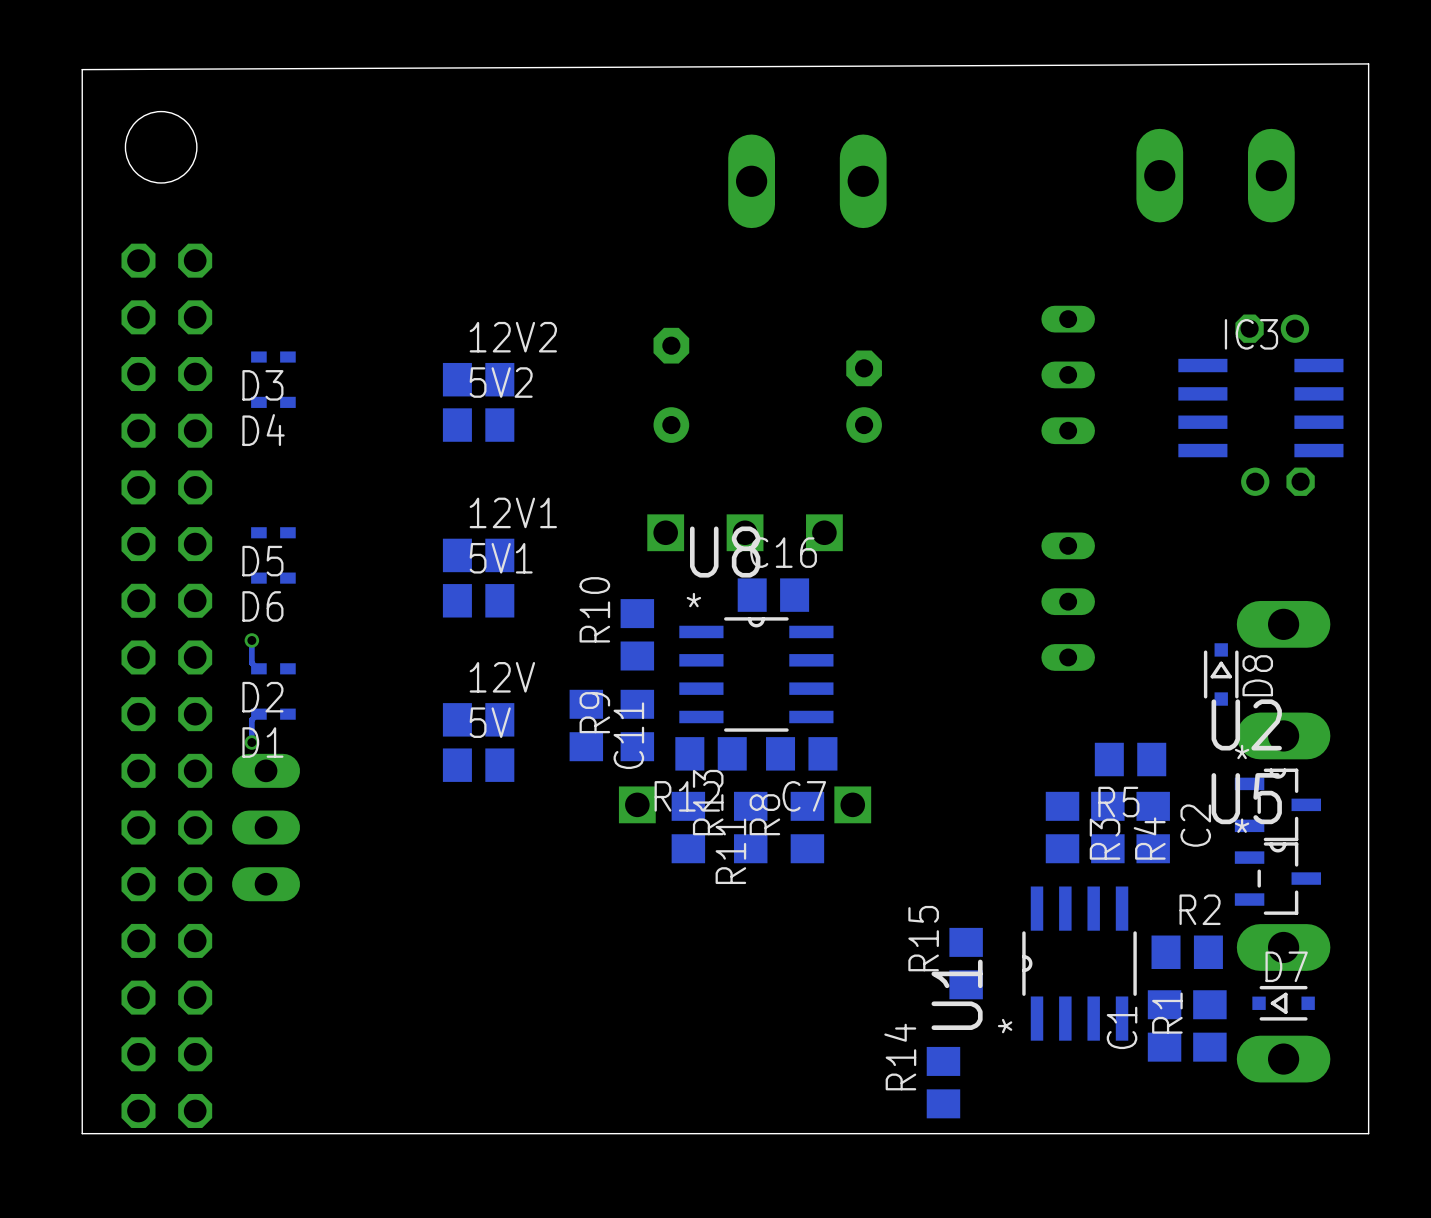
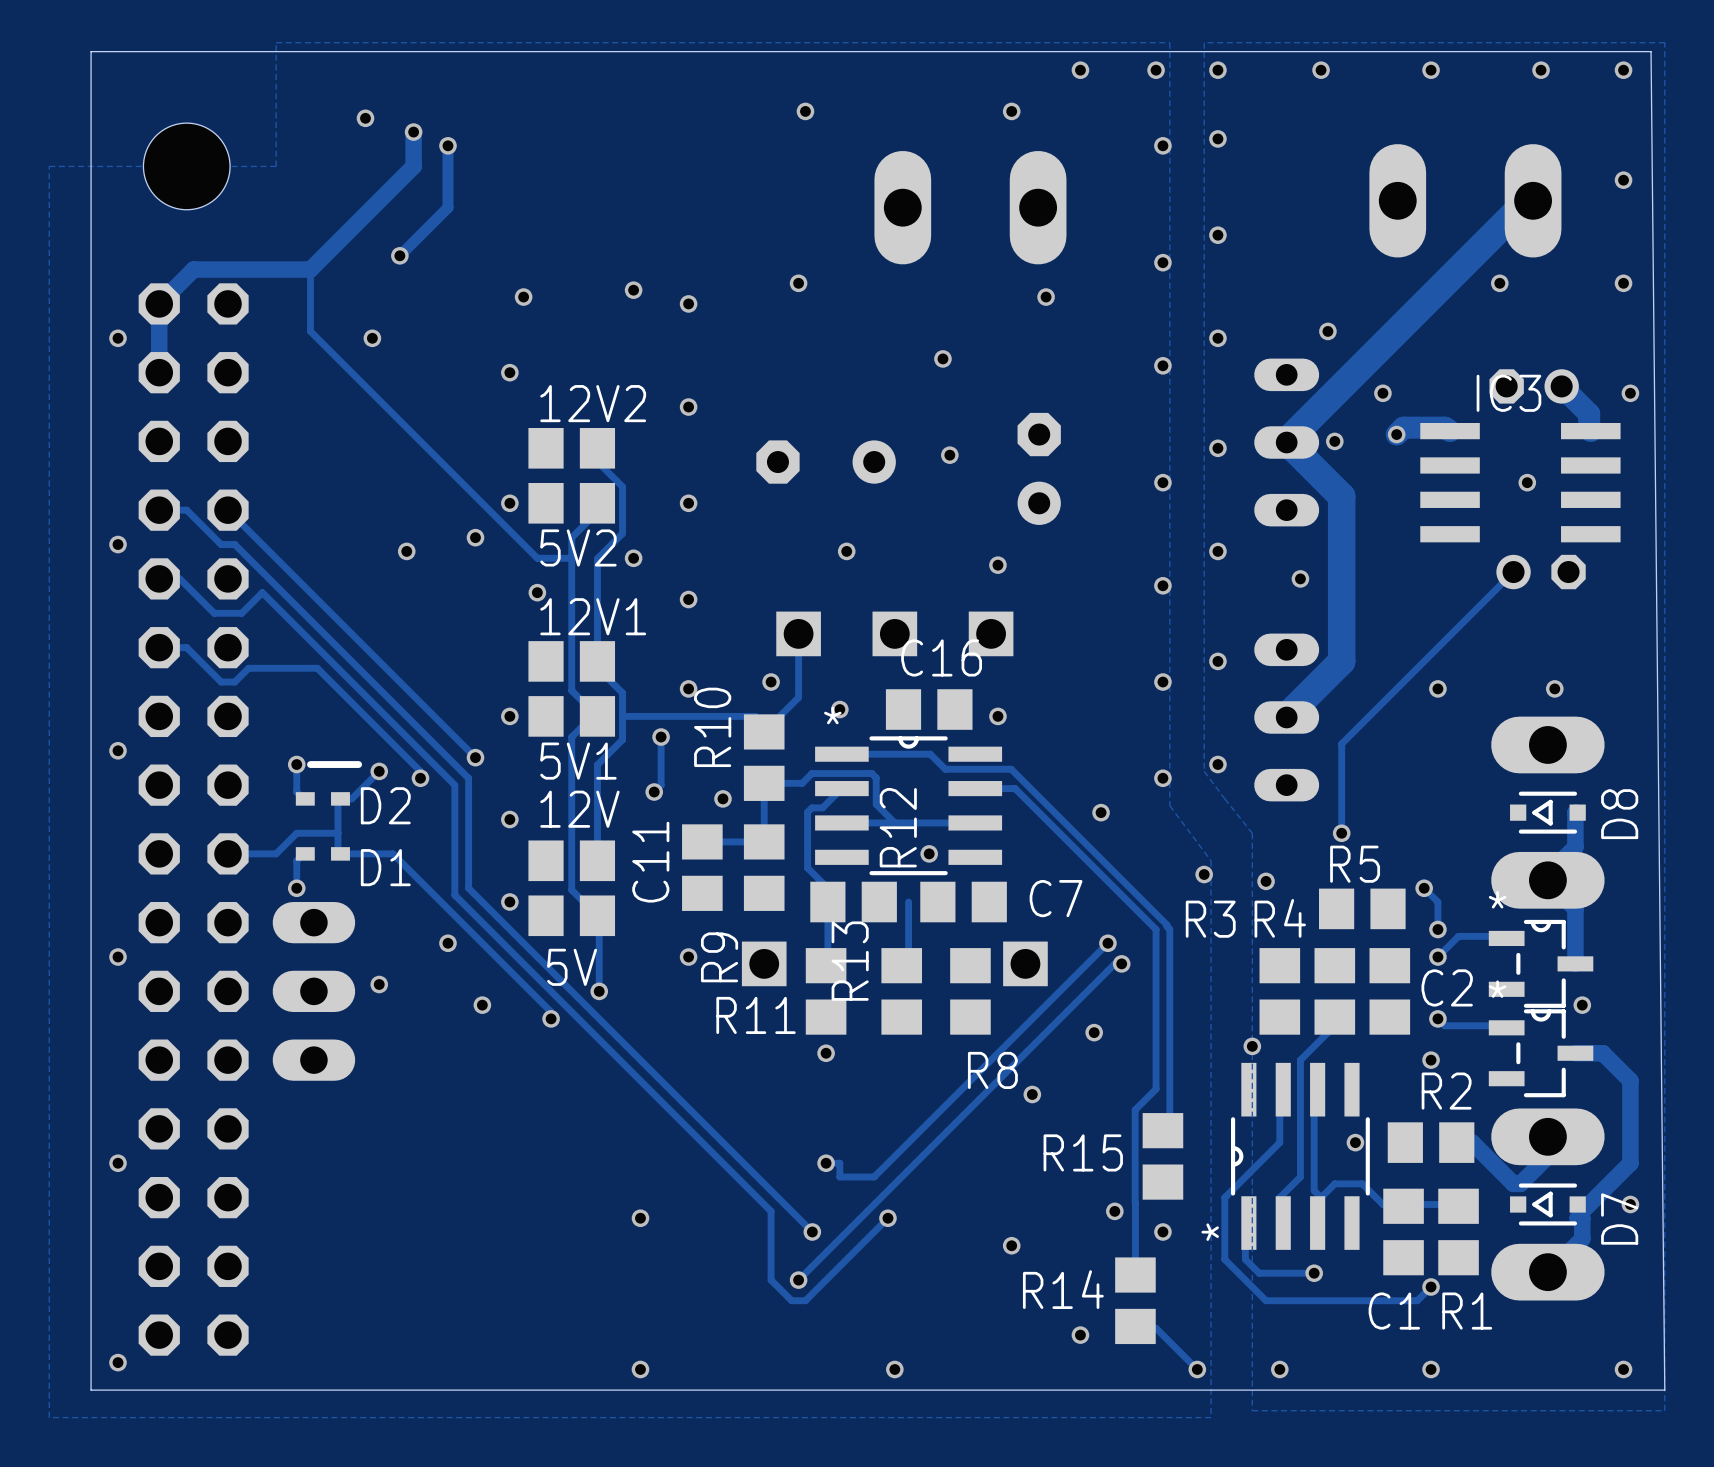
zone outline: none -> (1169, 42) (1169, 805) (1211, 860) (1211, 1417) (49, 1417) (49, 166) (276, 166) (276, 42) (1169, 42)
zone outline: none -> (1664, 42) (1204, 42) (1204, 771) (1252, 833) (1252, 1410) (1664, 1410) (1664, 42)
via: none -> (1080, 70)
via: none -> (1156, 70)
via: none -> (1217, 70)
via: none -> (1321, 70)
via: none -> (1431, 70)
via: none -> (1541, 70)
via: none -> (1623, 70)
board edge: (82, 69) (1368, 63) (1368, 1133) (82, 1133) -> (91, 72) (91, 51) (1651, 51) (1664, 1390) (91, 1390) (91, 1362)
via: none -> (805, 111)
via: none -> (1011, 111)
via: none -> (365, 118)
track: none -> (413, 132) (413, 166) (310, 269)
via: none -> (413, 132)
via: none -> (1217, 138)
track: none -> (447, 145) (447, 207) (399, 255)
via: none -> (447, 145)
via: none -> (1162, 145)
via: none -> (1623, 180)
track: none -> (1533, 200) (1527, 200) (1286, 441) (1341, 496) (1341, 661) (1286, 717)
via: none -> (1217, 235)
via: none -> (399, 255)
via: none -> (1162, 262)
track: none -> (310, 269) (193, 269) (159, 303) (159, 372)
track: none -> (310, 269) (310, 331) (537, 558) (571, 558)
via: none -> (798, 283)
via: none -> (1499, 283)
via: none -> (1623, 283)
via: none -> (633, 290)
via: none -> (523, 297)
via: none -> (1046, 297)
via: none -> (688, 303)
via: none -> (1327, 331)
via: none -> (118, 338)
via: none -> (372, 338)
via: none -> (1217, 338)
via: none -> (942, 358)
via: none -> (1162, 365)
via: none -> (509, 372)
track: none -> (1561, 386) (1589, 413) (1590, 431)
via: none -> (1382, 393)
via: none -> (1630, 393)
12V2 name position: 12V2 (513, 337) -> 12V2 (593, 403)
via: none -> (688, 407)
D3: (273, 357) -> none
track: none -> (1450, 431) (1444, 427) (1403, 427) (1396, 434)
via: none -> (1396, 434)
via: none -> (1334, 441)
track: none -> (597, 448) (597, 461) (622, 486) (622, 533) (597, 558) (597, 667) (622, 692) (622, 739) (597, 764) (597, 860)
via: none -> (1217, 448)
5V2 name position: 5V2 (501, 382) -> 5V2 (578, 547)
part rotation: 0° (671, 385) -> 90° counterclockwise (826, 462)
via: none -> (949, 455)
D4: (273, 402) -> none
via: none -> (1162, 482)
via: none -> (1527, 482)
via: none -> (509, 503)
via: none -> (688, 503)
track: none -> (159, 510) (186, 510) (221, 544) (234, 544) (468, 778) (468, 888) (812, 1231)
track: none -> (228, 510) (475, 757)
track: none -> (597, 510) (571, 537) (571, 690) (597, 716) (592, 716) (571, 737) (571, 890) (599, 915) (599, 991)
via: none -> (475, 537)
via: none -> (118, 544)
via: none -> (406, 551)
via: none -> (846, 551)
via: none -> (1217, 551)
via: none -> (633, 558)
via: none -> (997, 565)
track: none -> (1513, 572) (1341, 743) (1341, 833)
track: none -> (159, 578) (179, 578) (214, 613) (241, 613) (262, 592) (454, 785) (454, 895) (771, 1211) (771, 1280) (791, 1300) (805, 1300) (887, 1218)
via: none -> (1300, 578)
via: none -> (1162, 585)
via: none -> (537, 592)
via: none -> (688, 599)
12V1 name position: 12V1 (513, 512) -> 12V1 (593, 616)
D5: (273, 532) -> none
track: none -> (798, 633) (798, 697) (764, 731) (755, 716) (622, 716)
track: none -> (159, 647) (186, 647) (221, 682) (234, 682) (248, 668) (317, 668) (420, 771) (420, 778)
U8 name: U8 (725, 552) -> none
via: none -> (1217, 661)
5V1 name position: 5V1 (501, 558) -> 5V1 (578, 761)
via: none -> (771, 682)
via: none -> (1162, 682)
D6: (273, 578) -> none
via: none -> (688, 688)
via: none -> (1437, 688)
via: none -> (1554, 688)
via: none -> (839, 709)
via: none -> (509, 716)
via: none -> (997, 716)
track: none -> (661, 737) (661, 785) (654, 792)
via: none -> (661, 737)
via: none -> (118, 750)
track: none -> (841, 754) (930, 754) (945, 769) (1011, 769) (1167, 924) (1169, 929) (1169, 1123) (1162, 1130)
via: none -> (475, 757)
line: none -> (358, 764) (310, 764)
via: none -> (1217, 764)
track: none -> (379, 771) (351, 798) (338, 798) (338, 853) (392, 853) (551, 1012) (551, 1018)
via: none -> (379, 771)
via: none -> (420, 778)
via: none -> (1162, 778)
track: none -> (841, 788) (822, 807) (811, 807) (807, 812) (807, 868) (827, 888) (827, 963) (826, 965)
track: none -> (975, 788) (1015, 788) (1156, 929) (1156, 1089) (1135, 1109) (1135, 1202)
via: none -> (654, 792)
via: none -> (722, 798)
D8 rotation: 0° (1221, 674) -> 90° counterclockwise (1547, 812)
D8 position: (1221, 674) -> (1547, 812)
12V name position: 12V (502, 677) -> 12V (579, 809)
via: none -> (1101, 812)
track: none -> (1577, 812) (1575, 812) (1575, 847) (1547, 874) (1547, 881) (1575, 908) (1575, 963)
via: none -> (509, 819)
track: none -> (894, 822) (876, 804) (876, 777) (871, 773) (811, 773) (802, 783) (764, 783) (764, 841) (702, 841)
track: none -> (975, 822) (841, 822)
D2 name position: D2 (262, 697) -> D2 (385, 805)
track: none -> (338, 833) (296, 833) (276, 853) (228, 853)
via: none -> (1341, 833)
R9 name position: R9 (594, 712) -> R9 (719, 957)
via: none -> (929, 853)
5V name position: 5V (490, 722) -> 5V (572, 967)
U2 name: U2 (1246, 724) -> none
via: none -> (1204, 874)
C11 name position: C11 (628, 735) -> C11 (650, 862)
via: none -> (1266, 881)
D1 name position: D1 (262, 742) -> D1 (385, 867)
track: none -> (1424, 888) (1437, 902) (1437, 929)
via: none -> (1424, 888)
via: none -> (509, 902)
track: none -> (908, 902) (908, 957) (901, 965)
via: none -> (1437, 929)
track: none -> (1506, 938) (1506, 936) (1458, 936) (1437, 957)
via: none -> (447, 943)
track: none -> (1107, 943) (874, 1176) (839, 1176) (839, 1163) (826, 1163)
via: none -> (1107, 943)
R12 name rotation: 0° (687, 796) -> 90° counterclockwise (898, 827)
R12 name position: R12 (687, 796) -> R12 (898, 827)
C7 name position: C7 (804, 796) -> C7 (1056, 898)
U5 name: U5 (1246, 798) -> none
via: none -> (118, 957)
via: none -> (688, 957)
via: none -> (1437, 957)
R5 name position: R5 (1118, 802) -> R5 (1355, 864)
track: none -> (1121, 963) (1114, 963) (798, 1280)
via: none -> (1121, 963)
R8 name rotation: 0° (764, 814) -> 90° clockwise (992, 1070)
R8 name position: R8 (764, 814) -> R8 (992, 1070)
via: none -> (379, 984)
C2 name rotation: 0° (1195, 825) -> 90° clockwise (1447, 987)
via: none -> (599, 991)
via: none -> (482, 1005)
R4 name rotation: 0° (1149, 838) -> 90° clockwise (1280, 918)
R4 name position: R4 (1149, 838) -> R4 (1280, 918)
via: none -> (1582, 1005)
R3 name rotation: 0° (1105, 839) -> 90° clockwise (1210, 919)
R3 name position: R3 (1105, 839) -> R3 (1210, 919)
track: none -> (1327, 1012) (1327, 1032) (1300, 1060) (1300, 1176) (1279, 1197) (1279, 1218) (1283, 1223)
via: none -> (551, 1018)
track: none -> (1437, 1018) (1444, 1025) (1506, 1025) (1506, 1027)
via: none -> (1437, 1018)
R11 name rotation: 0° (730, 851) -> 90° clockwise (756, 1015)
R11 name position: R11 (730, 851) -> R11 (756, 1015)
via: none -> (1094, 1032)
via: none -> (1252, 1046)
via: none -> (826, 1053)
track: none -> (1575, 1053) (1602, 1053) (1630, 1080) (1630, 1163) (1582, 1211) (1577, 1218) (1582, 1218) (1582, 1238) (1547, 1273) (1547, 1285)
via: none -> (1431, 1060)
track: none -> (1283, 1089) (1279, 1094) (1279, 1142) (1224, 1197) (1224, 1259) (1266, 1300) (1417, 1300) (1431, 1286)
track: none -> (1317, 1089) (1314, 1094) (1314, 1190) (1321, 1197) (1317, 1223) (1314, 1218) (1314, 1204) (1334, 1183) (1362, 1183) (1382, 1204) (1458, 1204) (1458, 1206)
via: none -> (1032, 1094)
R15 name rotation: 0° (923, 938) -> 90° clockwise (1083, 1152)
via: none -> (1355, 1142)
track: none -> (1456, 1142) (1472, 1142) (1513, 1183) (1520, 1183) (1547, 1156) (1547, 1150)
D7 name rotation: 0° (1286, 966) -> 90° counterclockwise (1619, 1219)
D7 name position: D7 (1286, 966) -> D7 (1619, 1219)
via: none -> (118, 1163)
via: none -> (826, 1163)
U1 name: U1 (957, 994) -> none
track: none -> (1135, 1203) (1135, 1275)
via: none -> (1630, 1204)
via: none -> (1114, 1211)
R1 name rotation: 0° (1167, 1013) -> 90° clockwise (1467, 1311)
R1 name position: R1 (1167, 1013) -> R1 (1467, 1311)
via: none -> (640, 1218)
via: none -> (887, 1218)
track: none -> (1248, 1223) (1245, 1225) (1245, 1259) (1259, 1273) (1314, 1273)
via: none -> (812, 1231)
via: none -> (1162, 1231)
C1 name rotation: 0° (1122, 1027) -> 90° clockwise (1394, 1311)
C1 name position: C1 (1122, 1027) -> C1 (1394, 1311)
via: none -> (1011, 1245)
R14 name rotation: 0° (900, 1057) -> 90° clockwise (1063, 1289)
via: none -> (1314, 1273)
via: none -> (798, 1280)
via: none -> (1431, 1286)
track: none -> (1135, 1326) (1135, 1328) (1156, 1328) (1197, 1369)
via: none -> (1080, 1335)
via: none -> (118, 1362)
via: none -> (640, 1369)
via: none -> (894, 1369)
via: none -> (1197, 1369)
via: none -> (1279, 1369)
via: none -> (1431, 1369)
via: none -> (1623, 1369)

